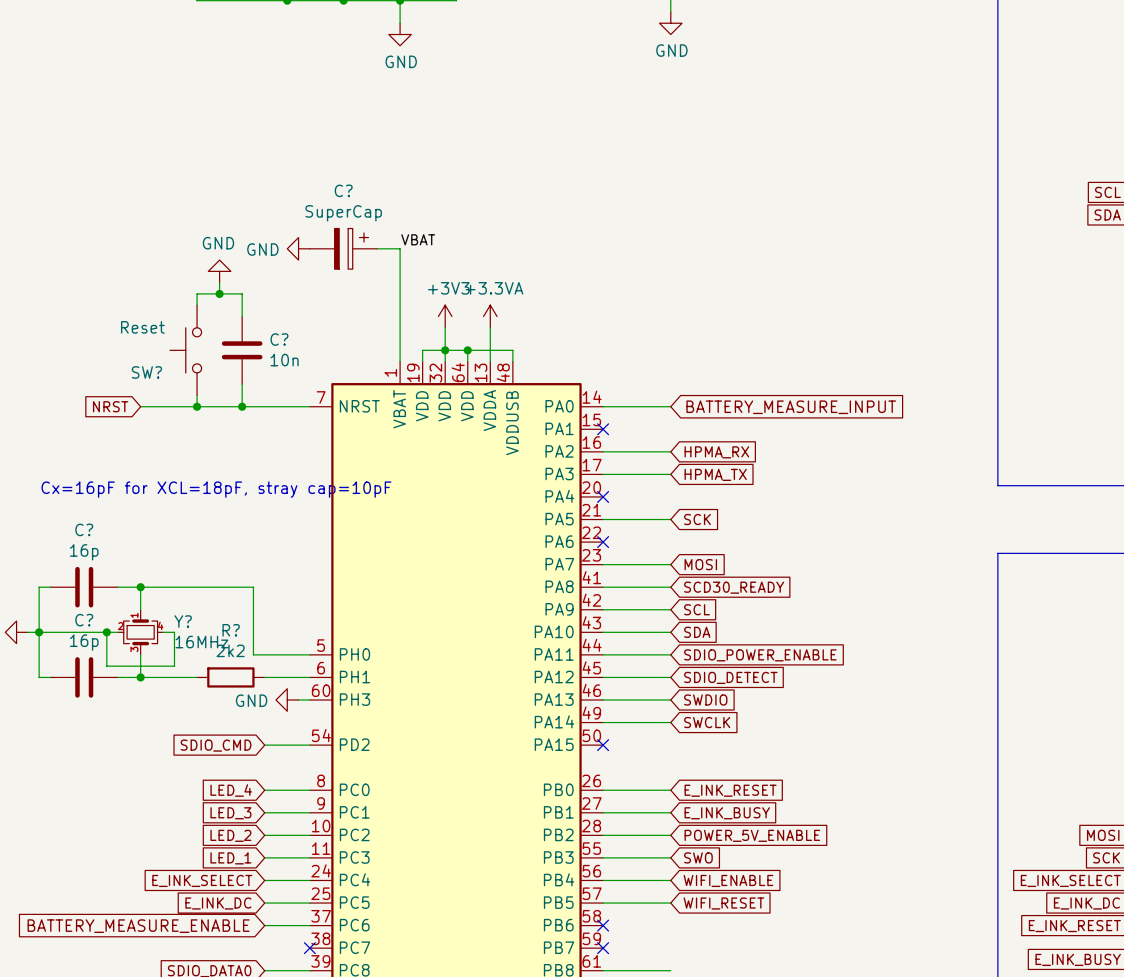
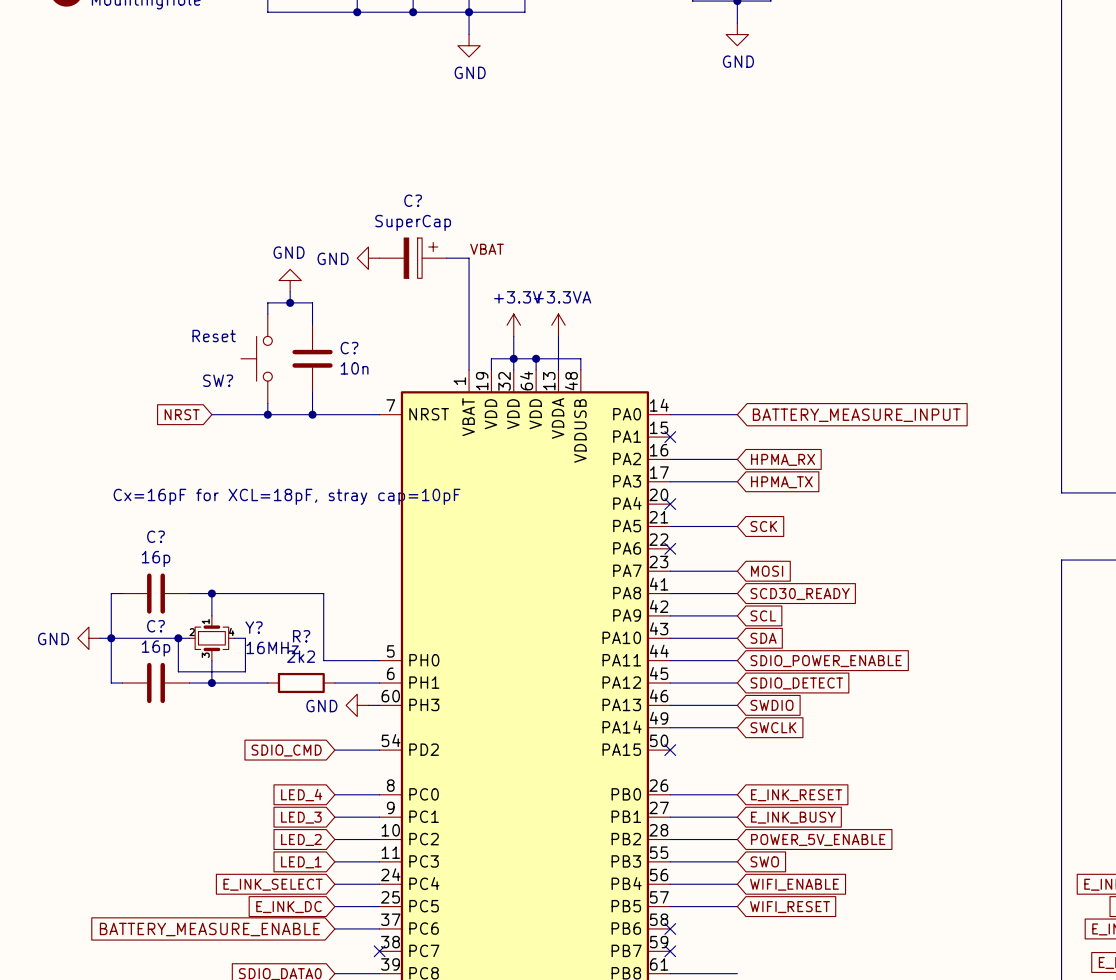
power symbol: +3V3 (445, 316) -> +3.3V (513, 325)

